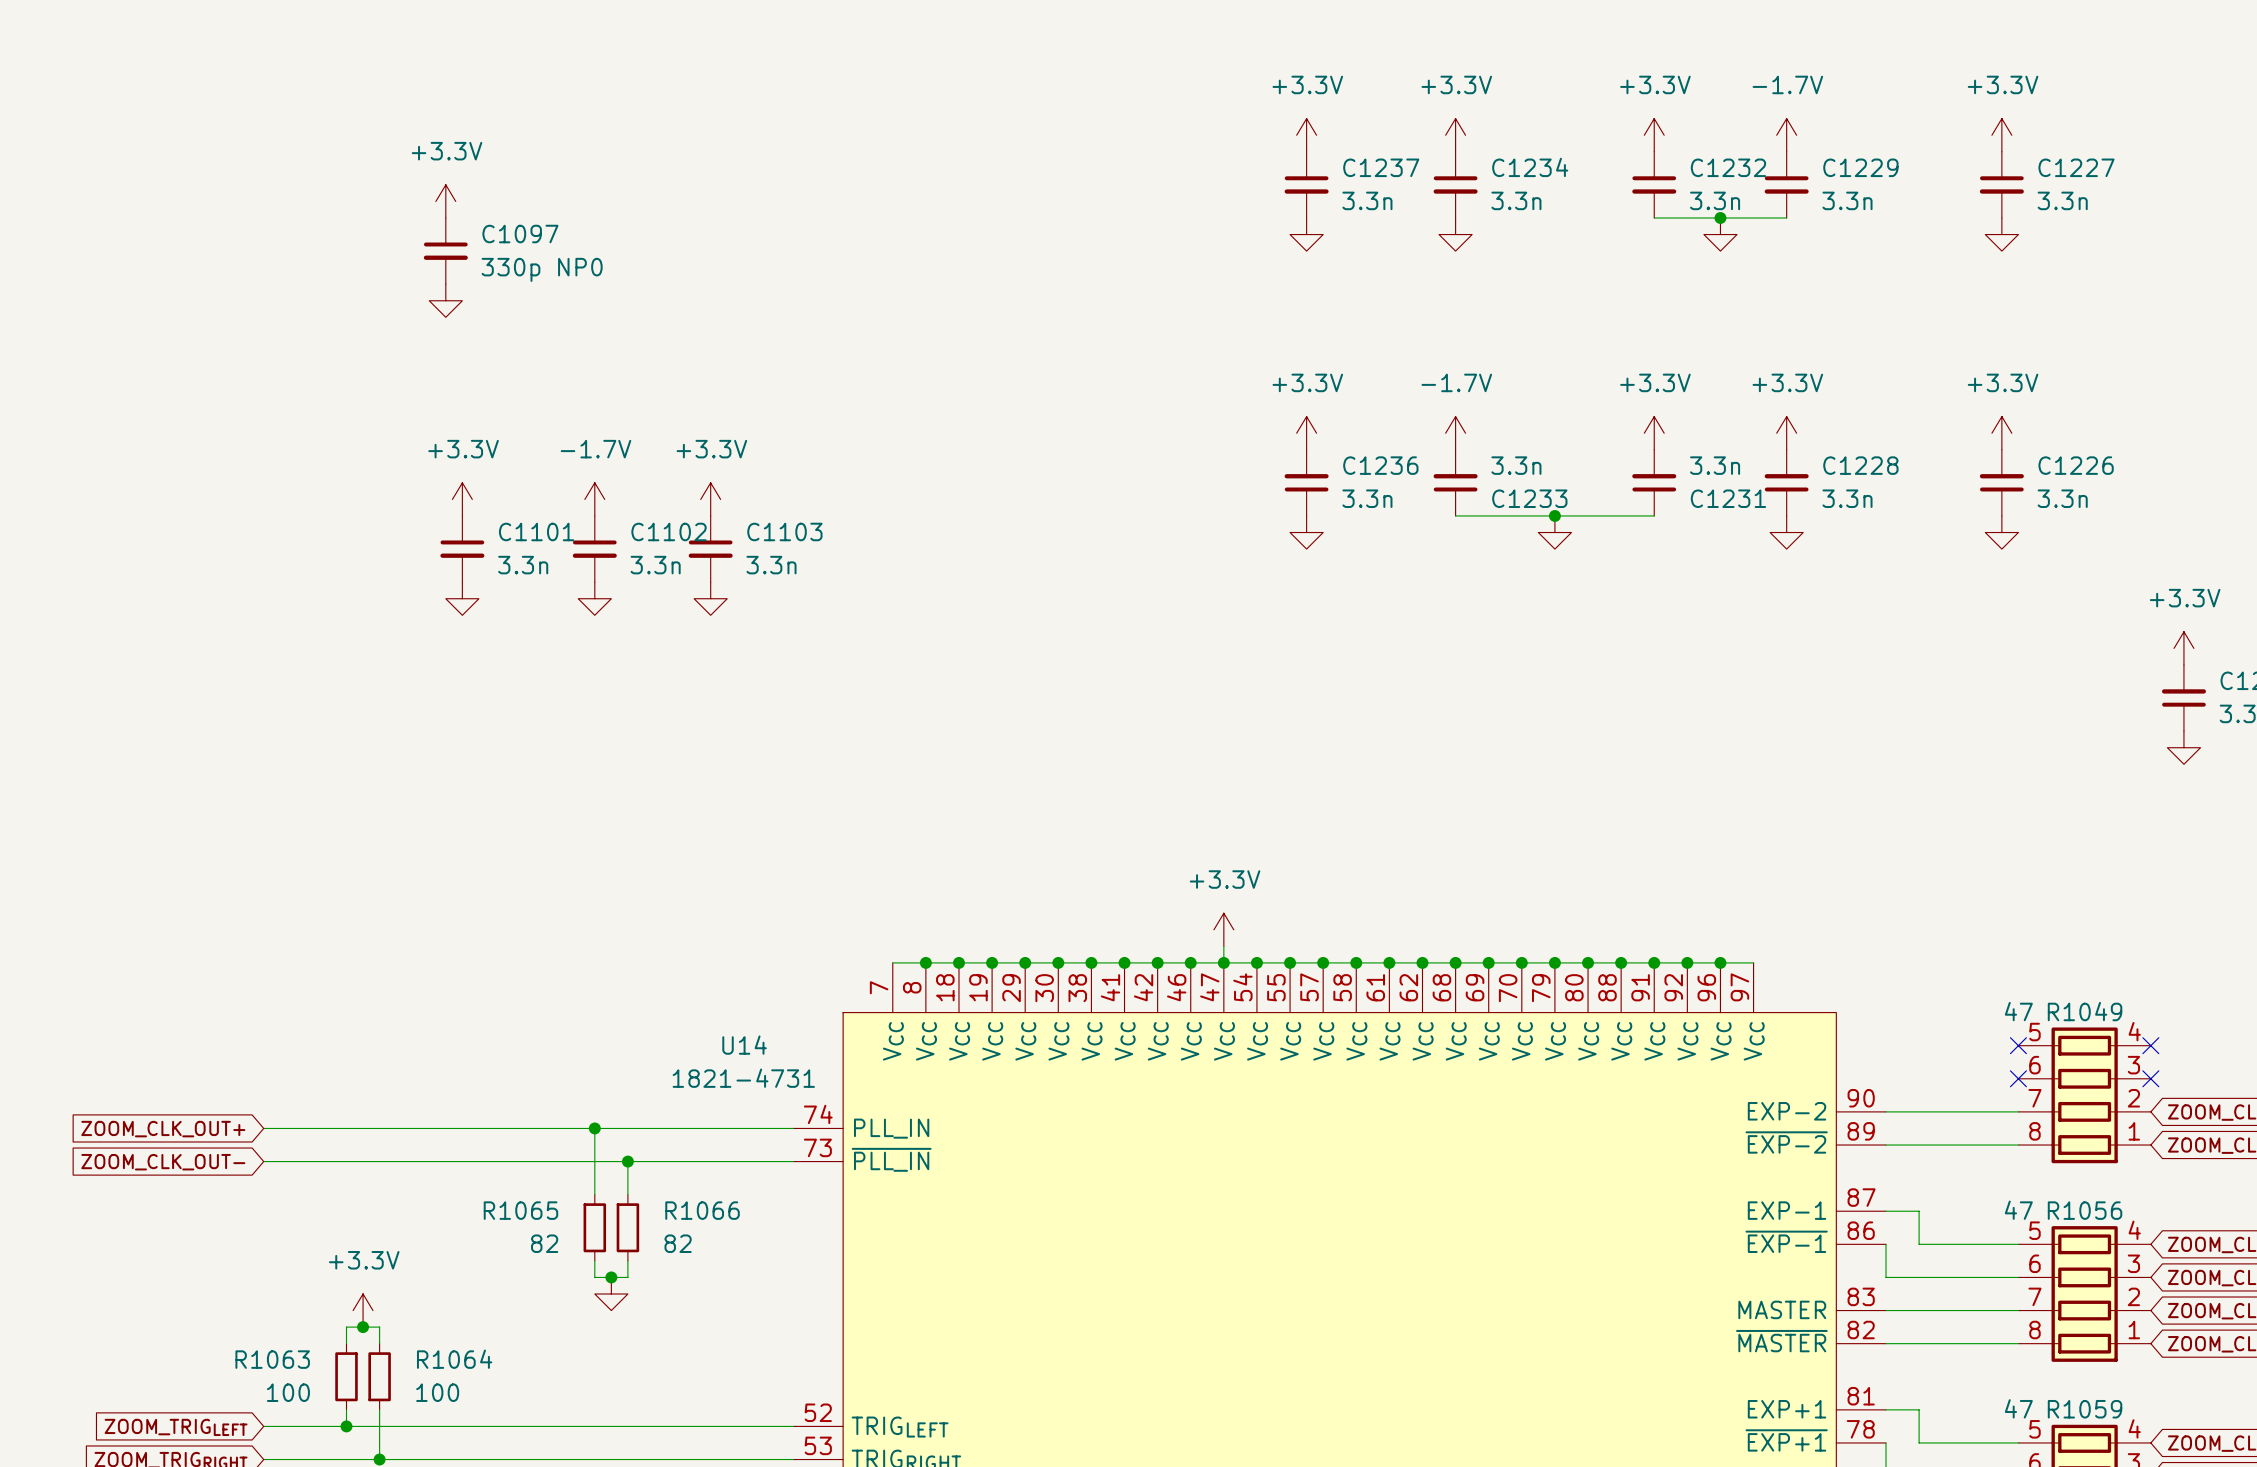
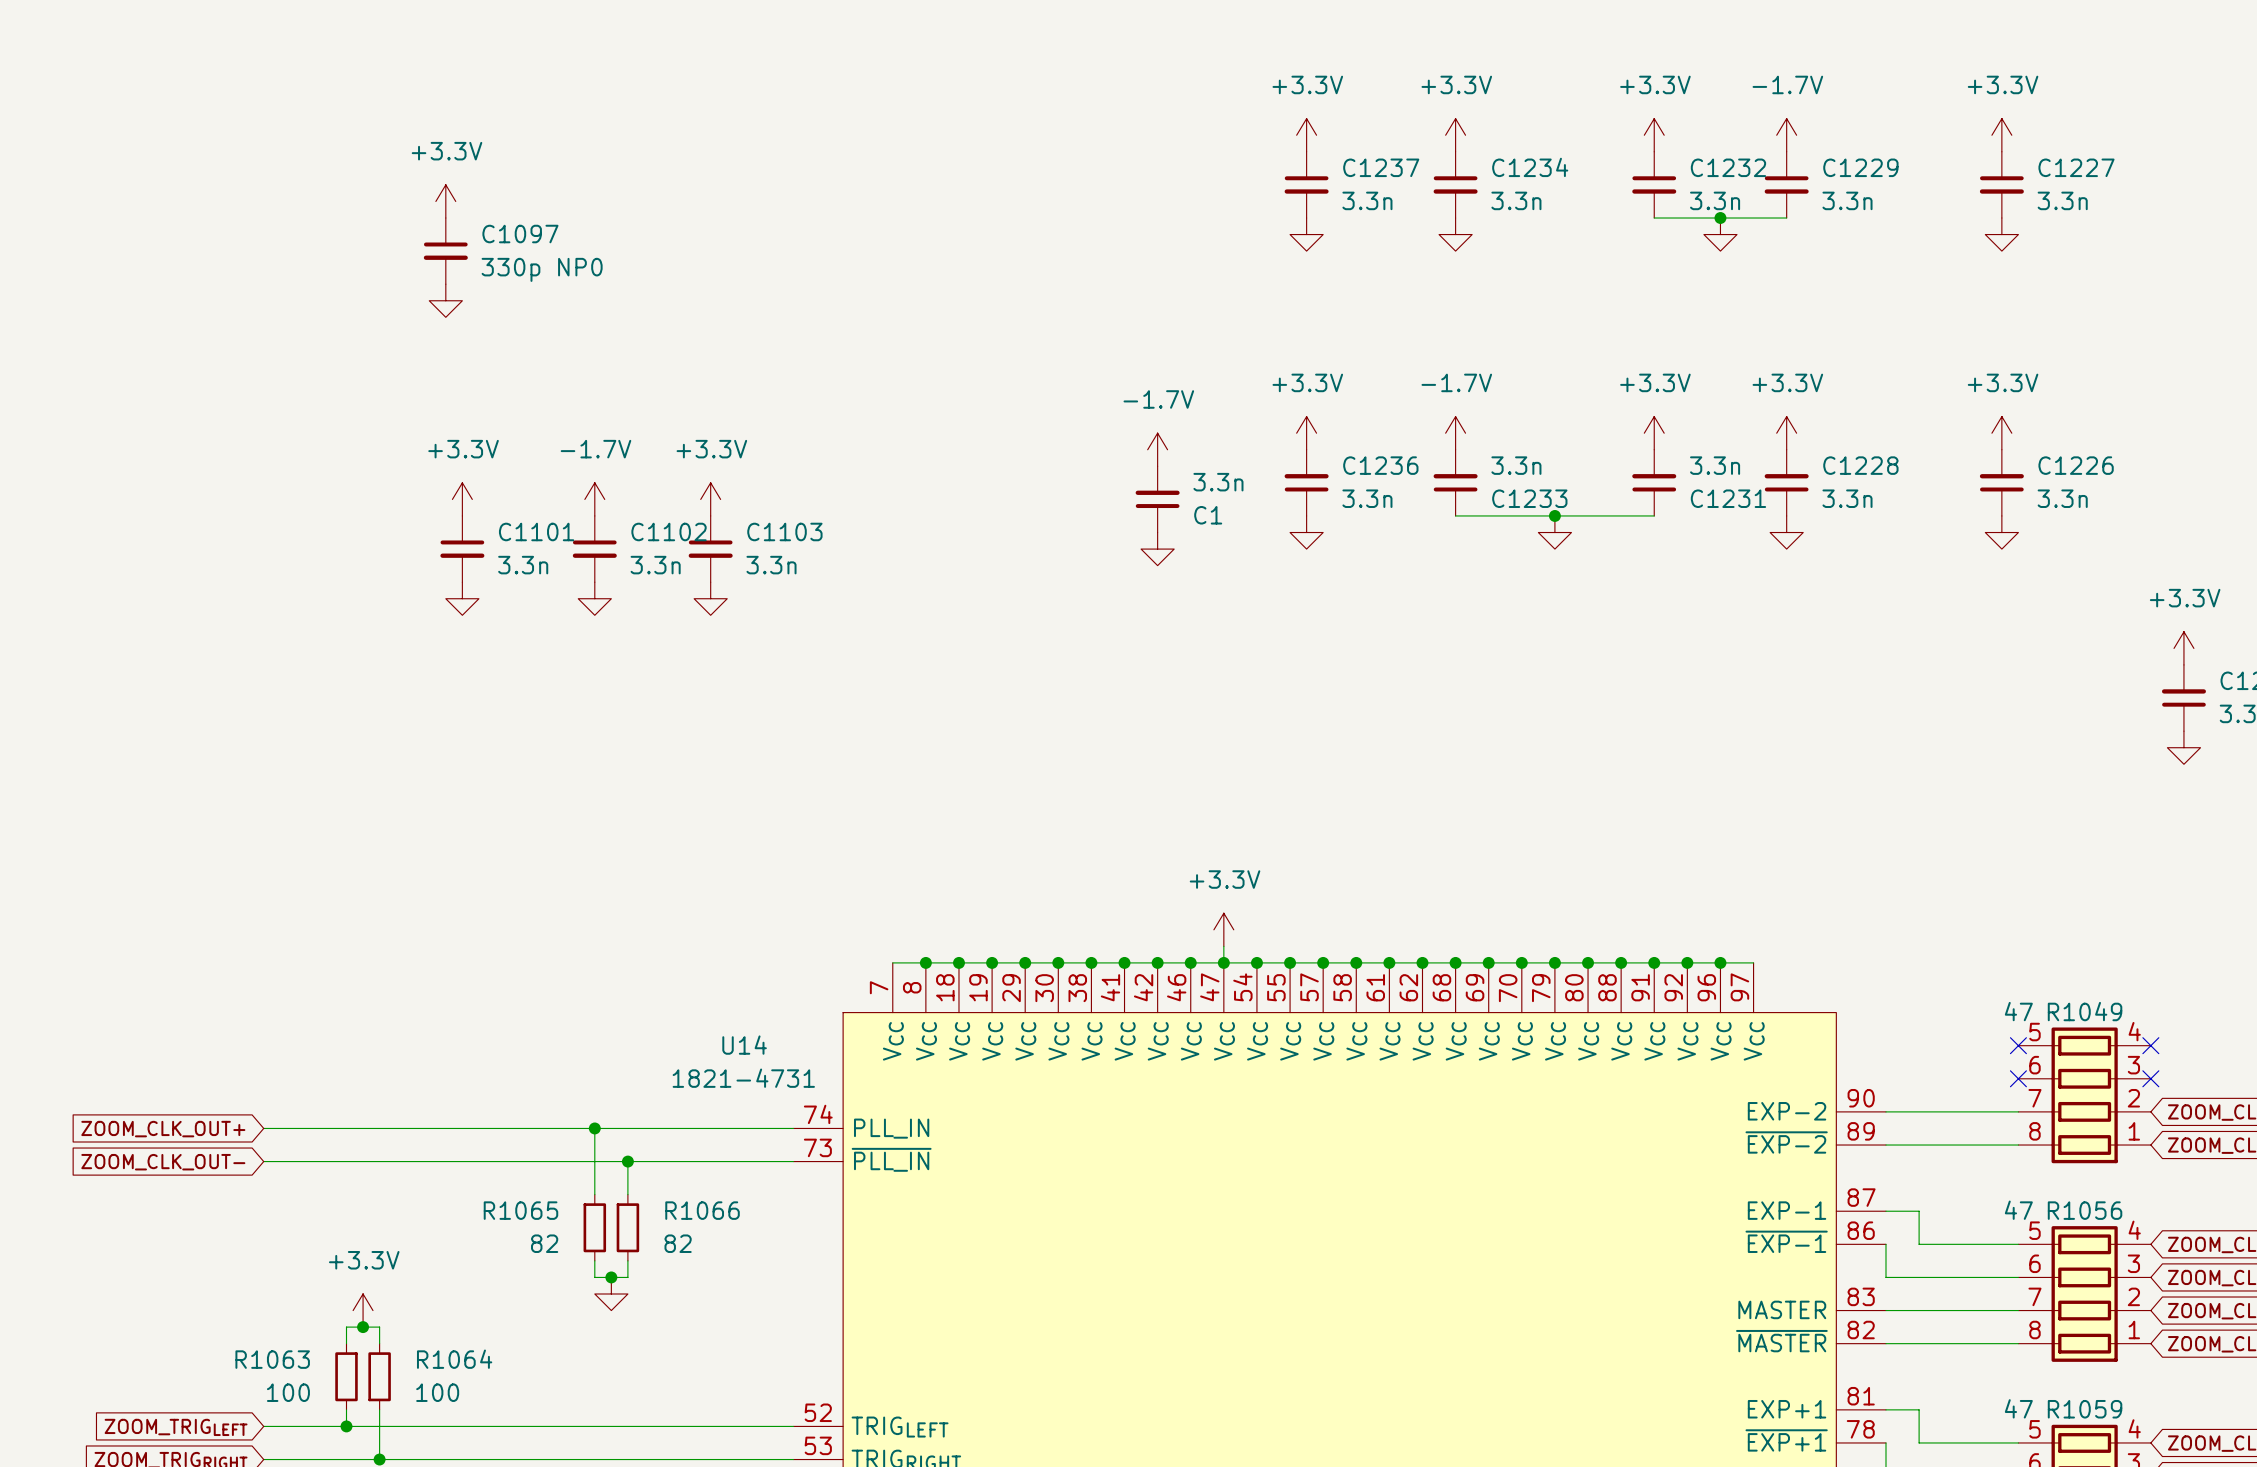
power symbol: none -> -1.7V (1157, 449)
C1: none -> 3.3n (1157, 499)
power symbol: none -> (1157, 549)

